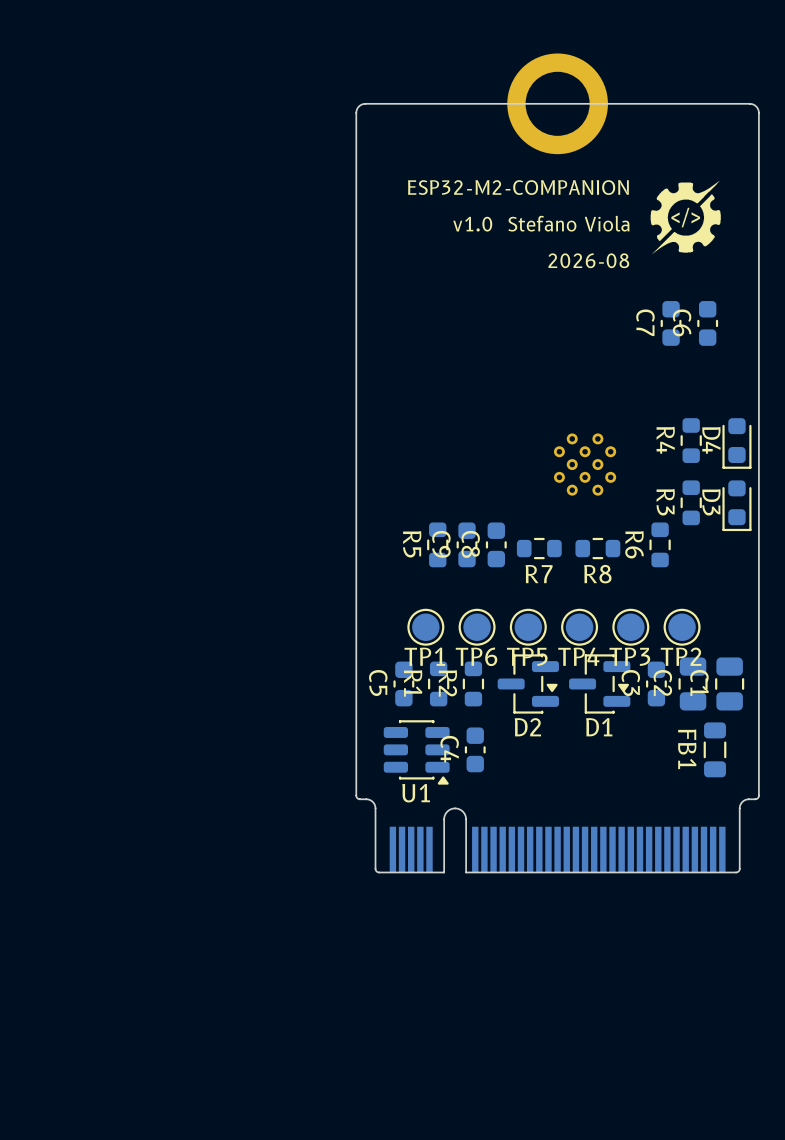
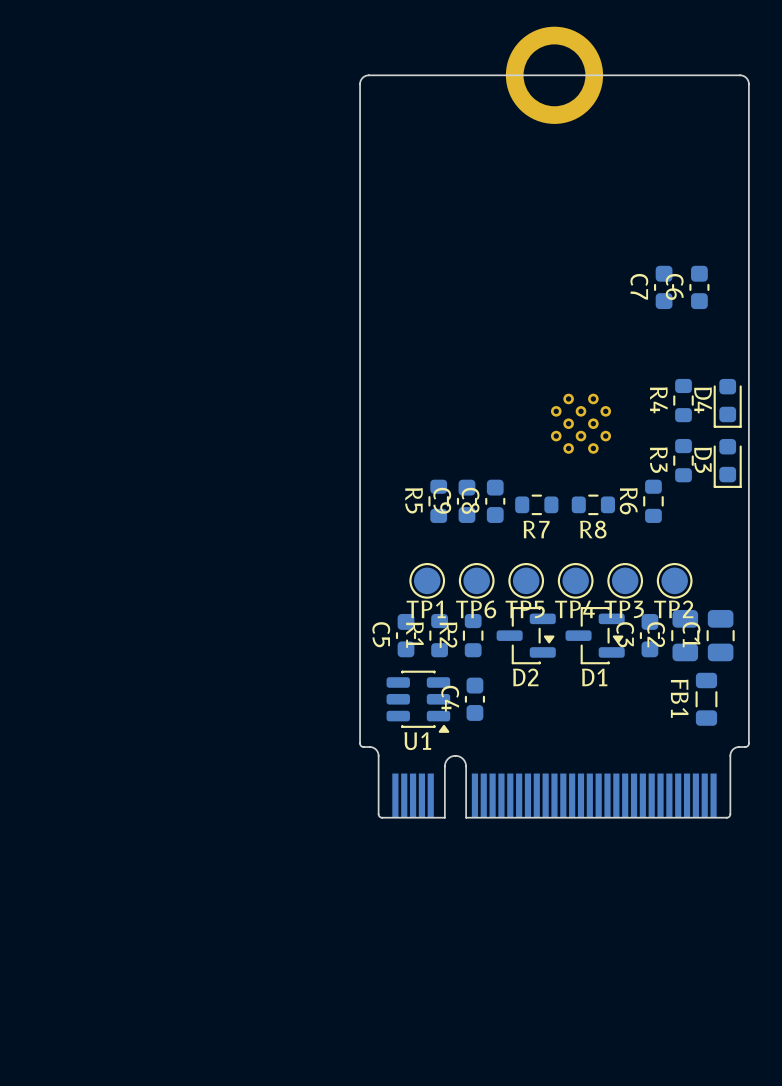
drawing: [650, 180, 721, 254] -> none
text: ESP32-M2-COMPANION (518, 187) -> none
text: v1.0 Stefano Viola (541, 223) -> none
text: 2026-08 (588, 260) -> none

